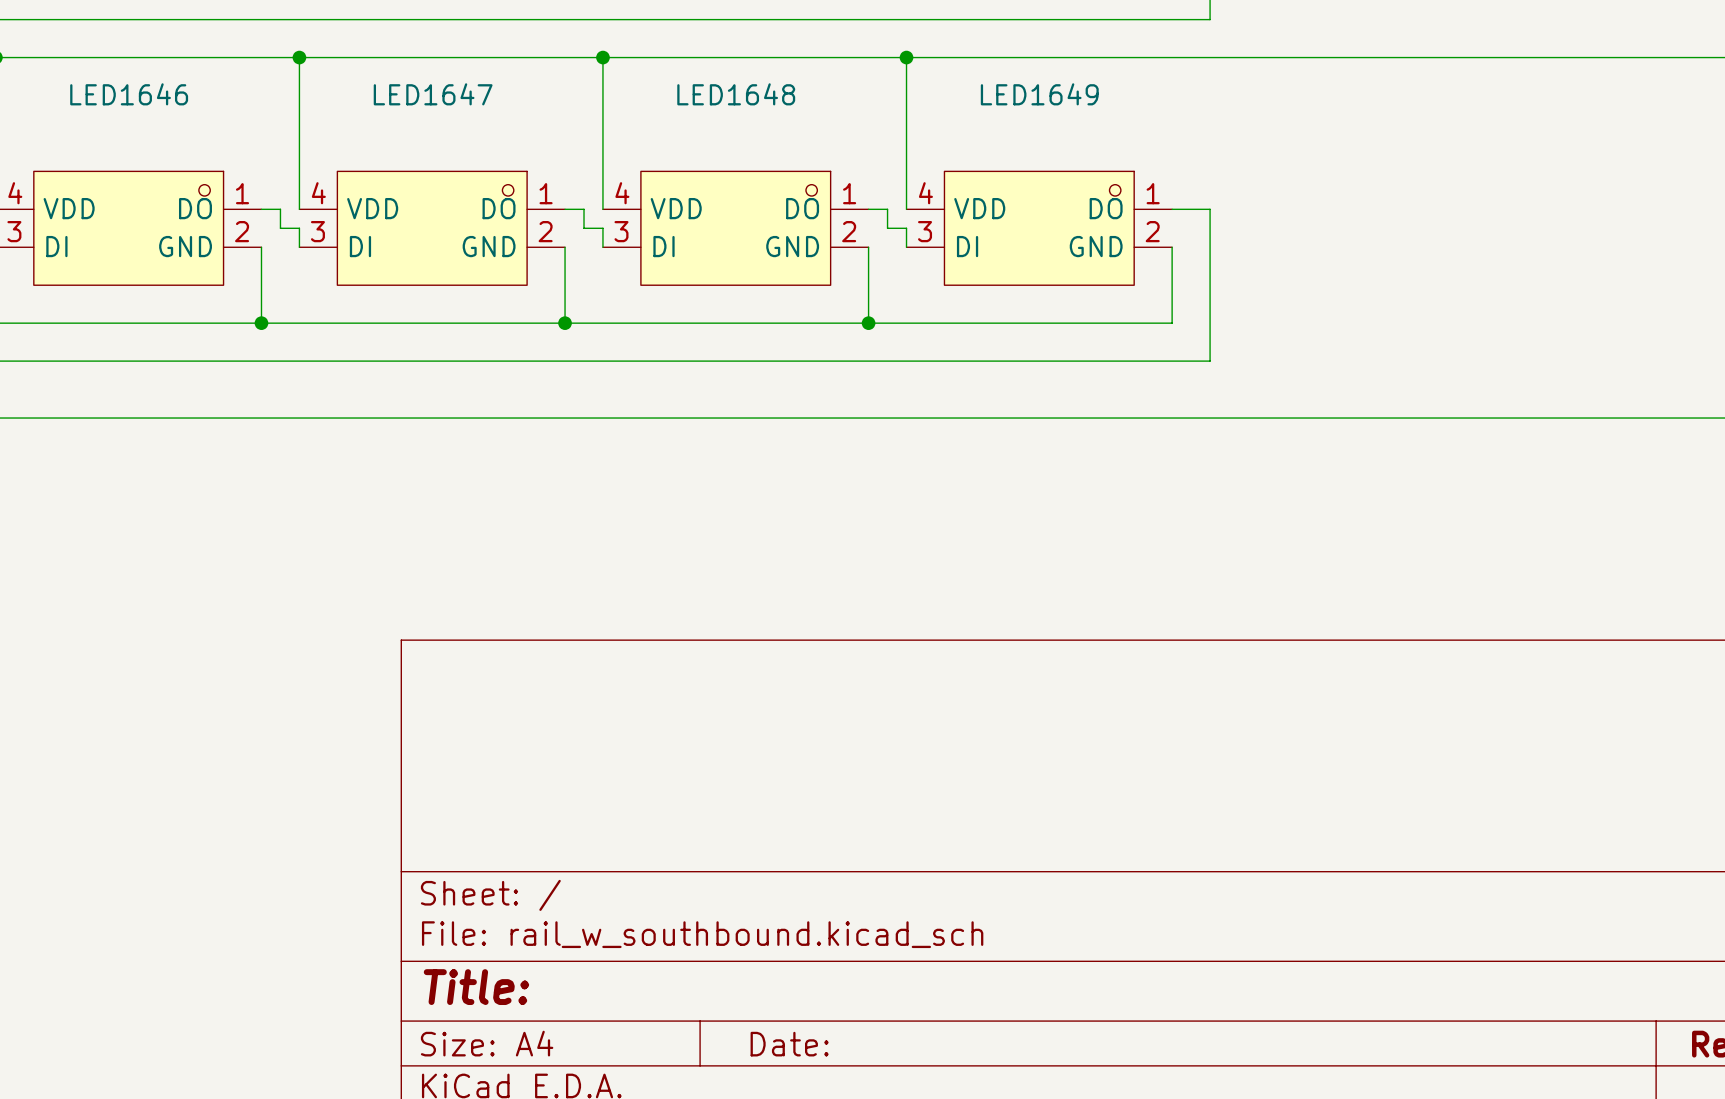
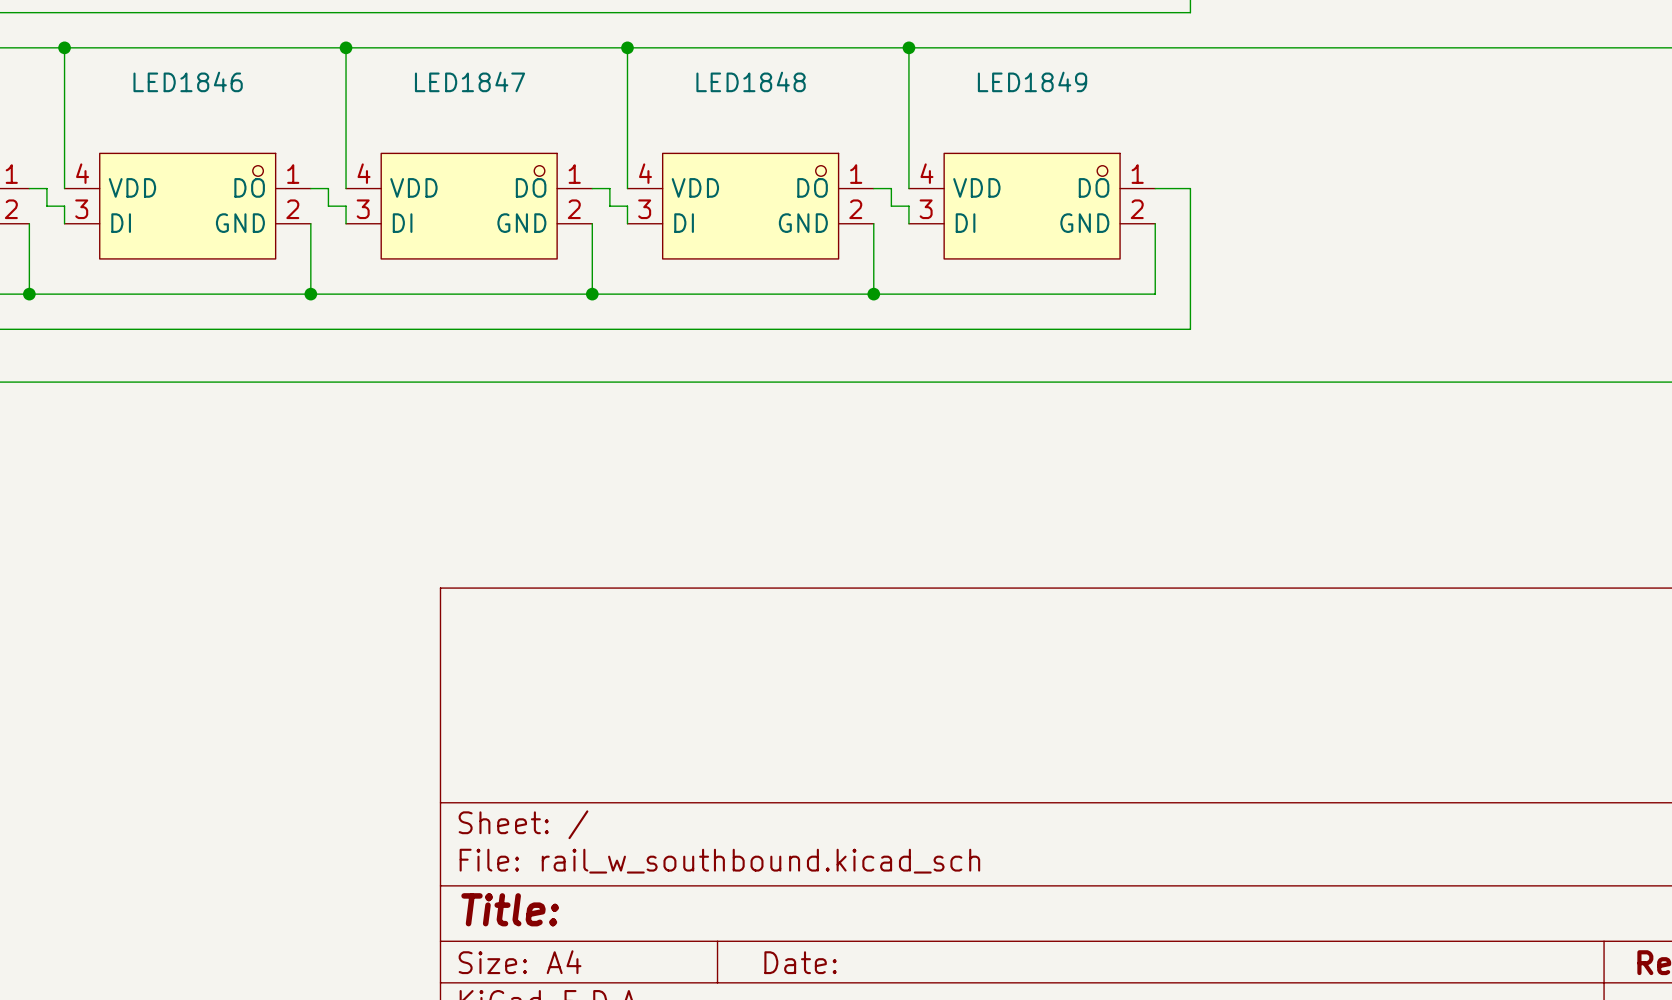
LED1646 name: LED1646 (129, 94) -> LED1846 (188, 81)
LED1647 name: LED1647 (433, 94) -> LED1847 (470, 81)
LED1648 name: LED1648 (736, 94) -> LED1848 (751, 81)
LED1649 name: LED1649 (1039, 94) -> LED1849 (1032, 81)

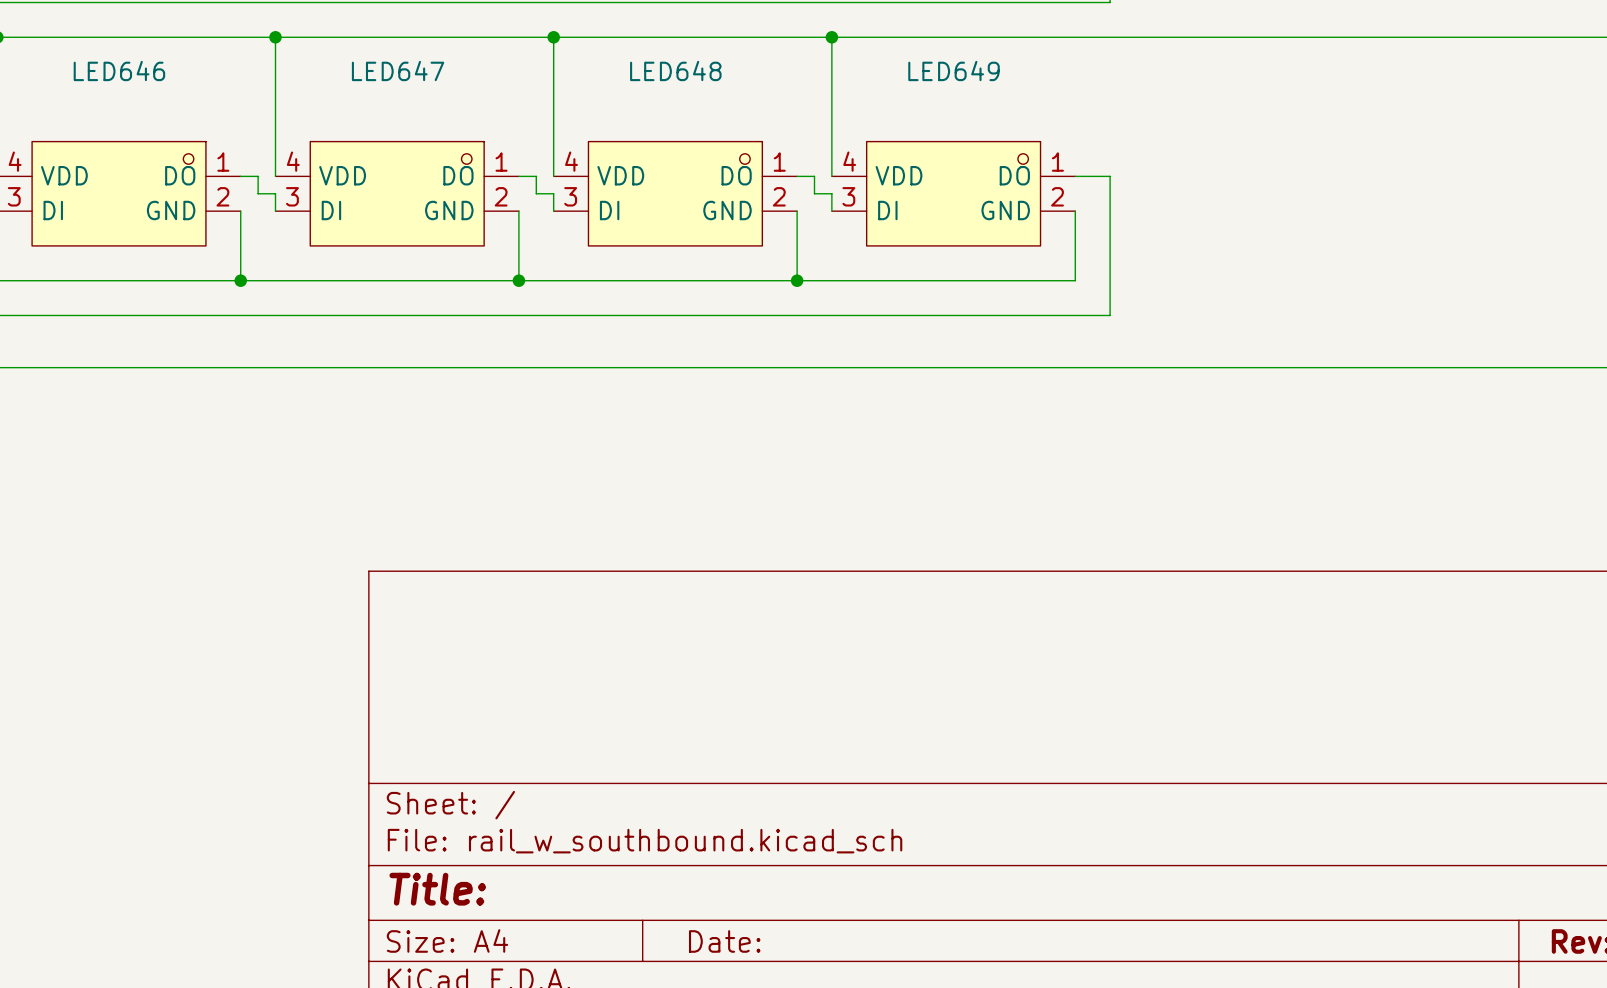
LED1846 name: LED1846 (188, 81) -> LED646 (119, 70)
LED1847 name: LED1847 (470, 81) -> LED647 (398, 70)
LED1848 name: LED1848 (751, 81) -> LED648 (675, 70)
LED1849 name: LED1849 (1032, 81) -> LED649 (954, 70)

